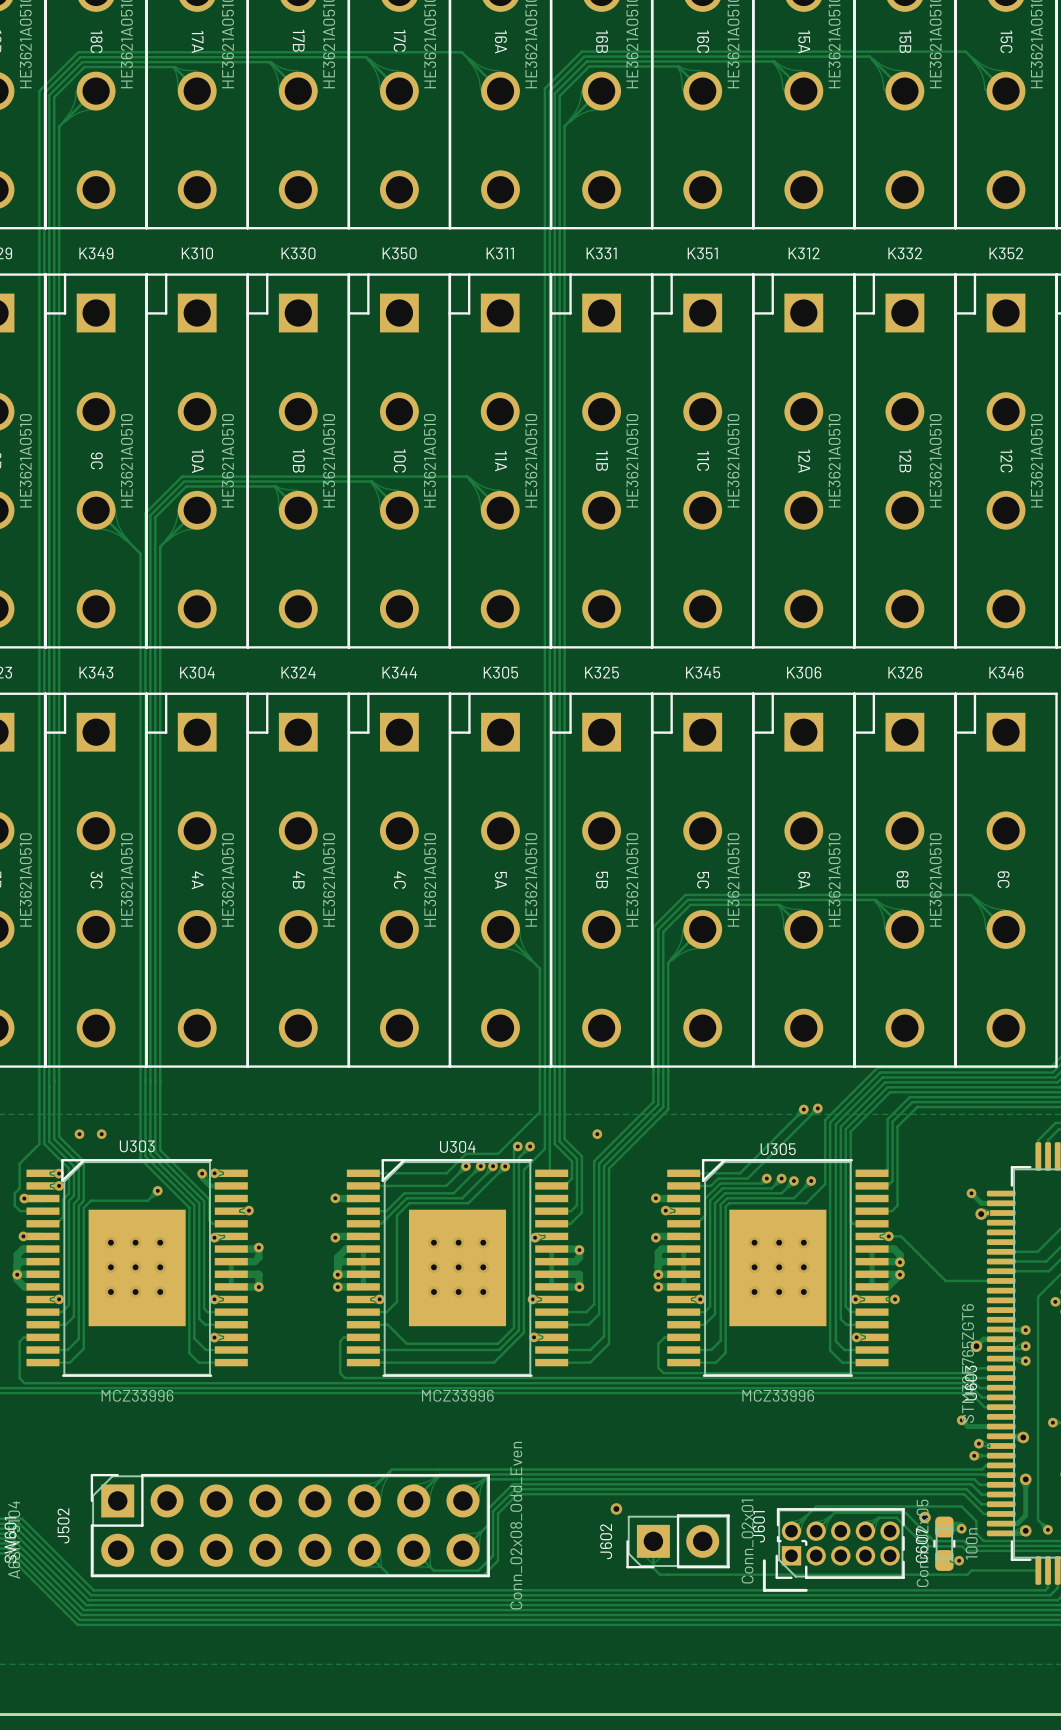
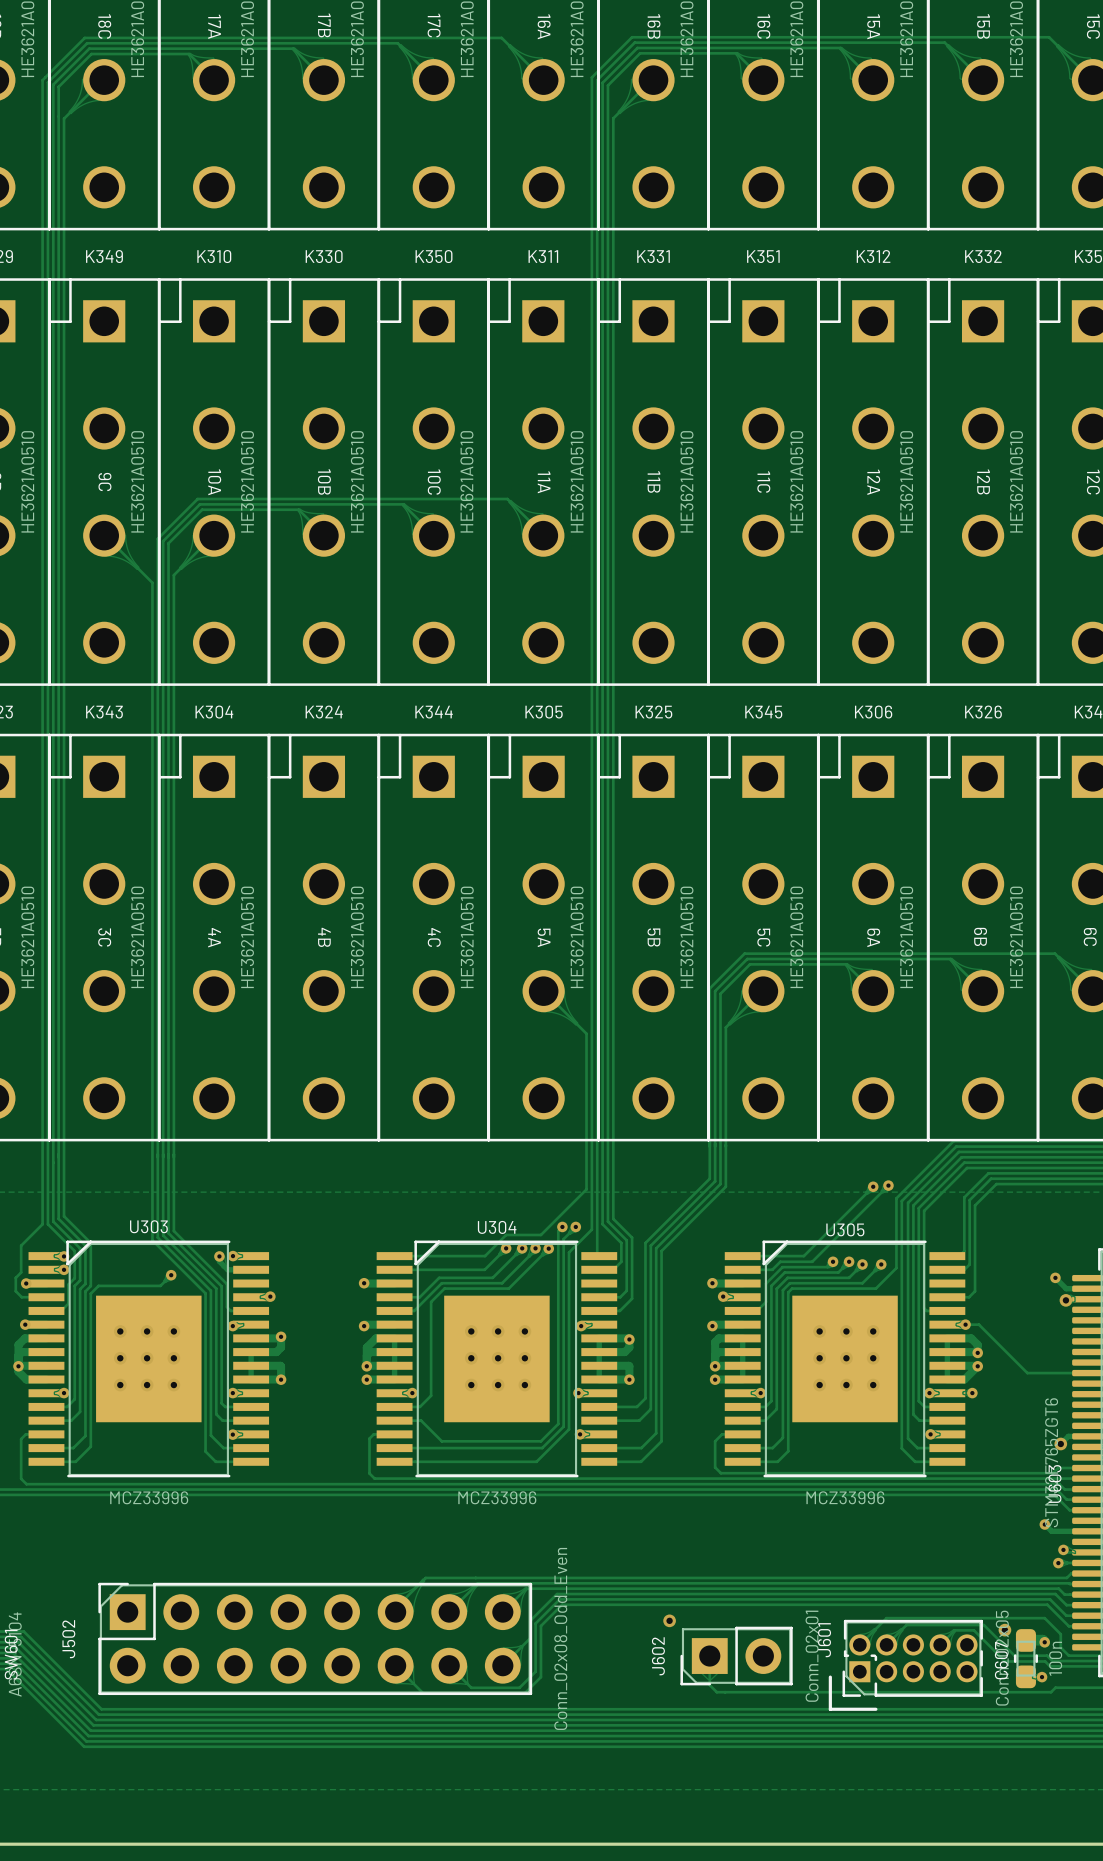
via: (79, 1134) -> none
via: (101, 1134) -> none
via: (597, 1134) -> none

